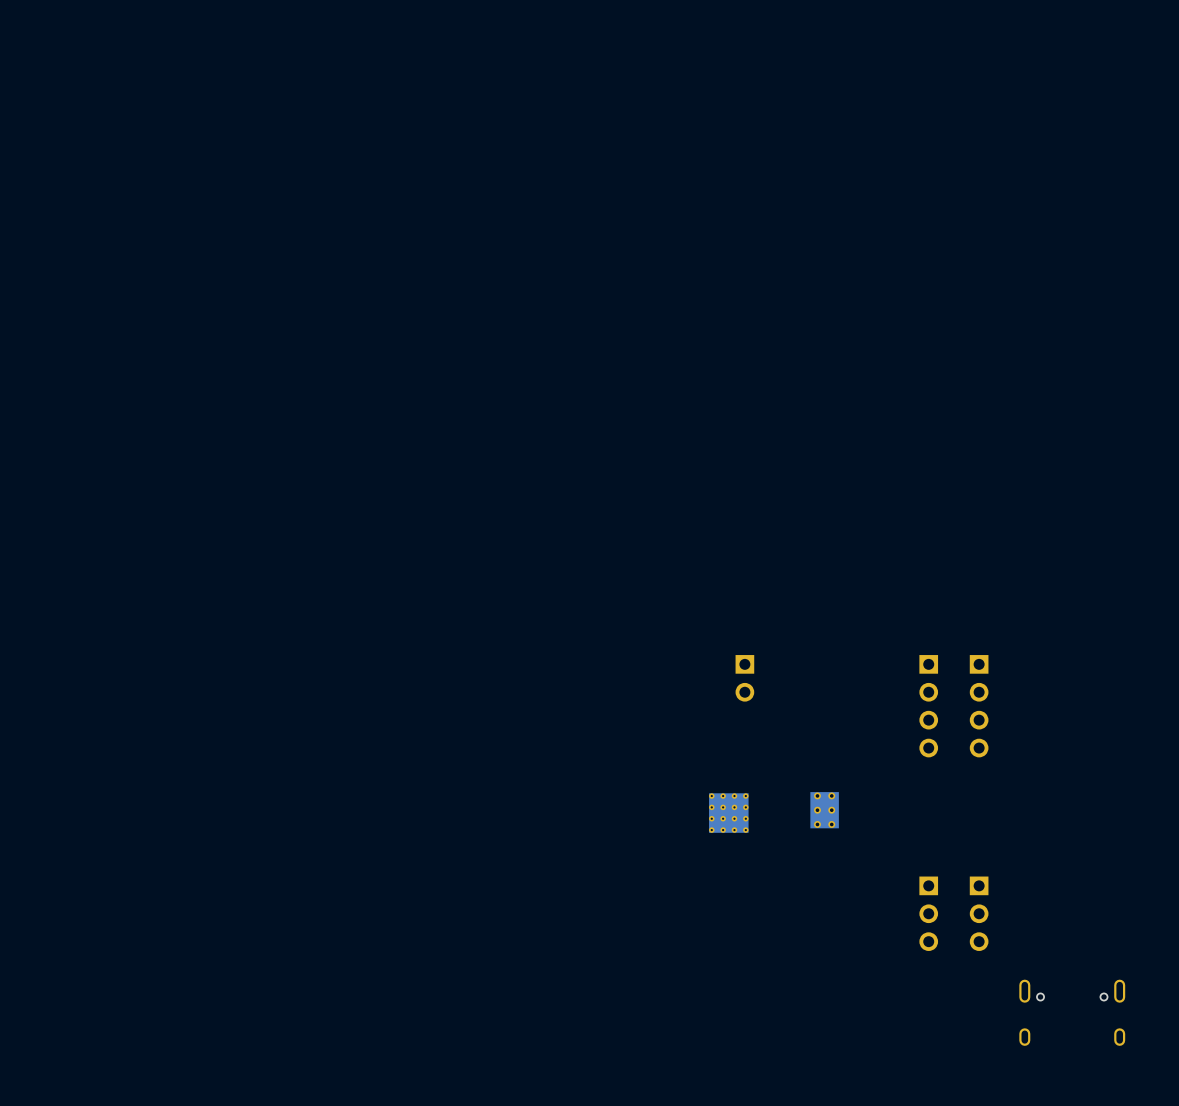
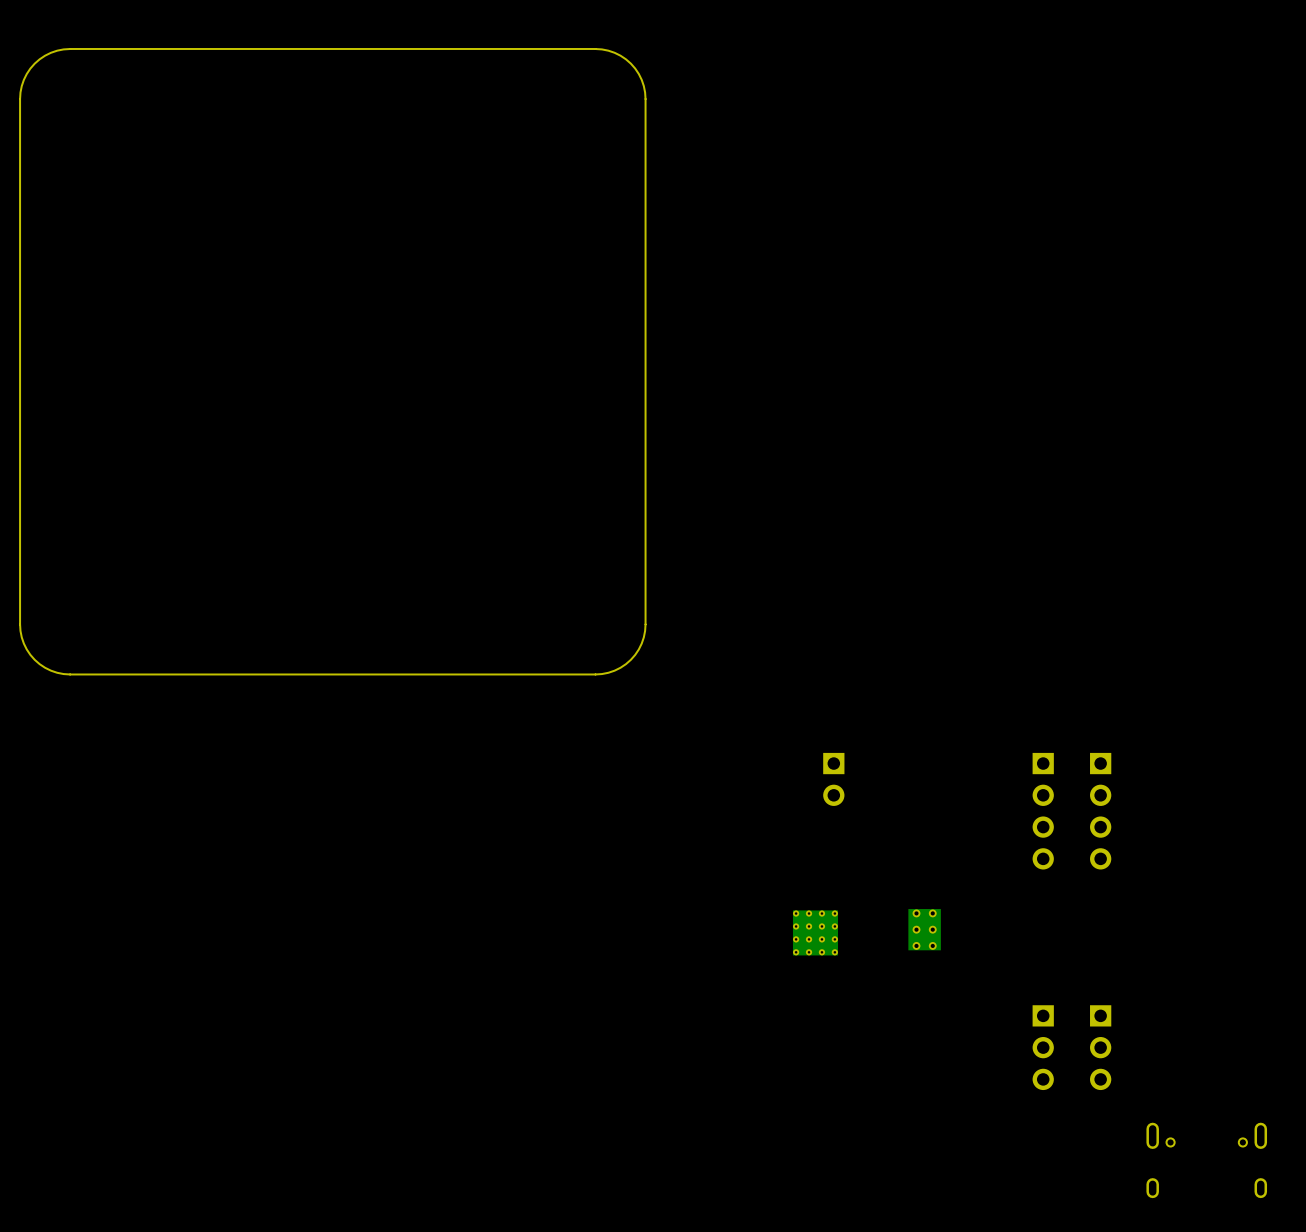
board edge: none -> (595, 48) (70, 48) (50, 52) (34, 63) (23, 79) (20, 99) (20, 624) (23, 643) (34, 659) (50, 670) (70, 674) (595, 674) (614, 670) (630, 659) (641, 643) (645, 624) (645, 99) (641, 79) (630, 63) (614, 52) (595, 48)

